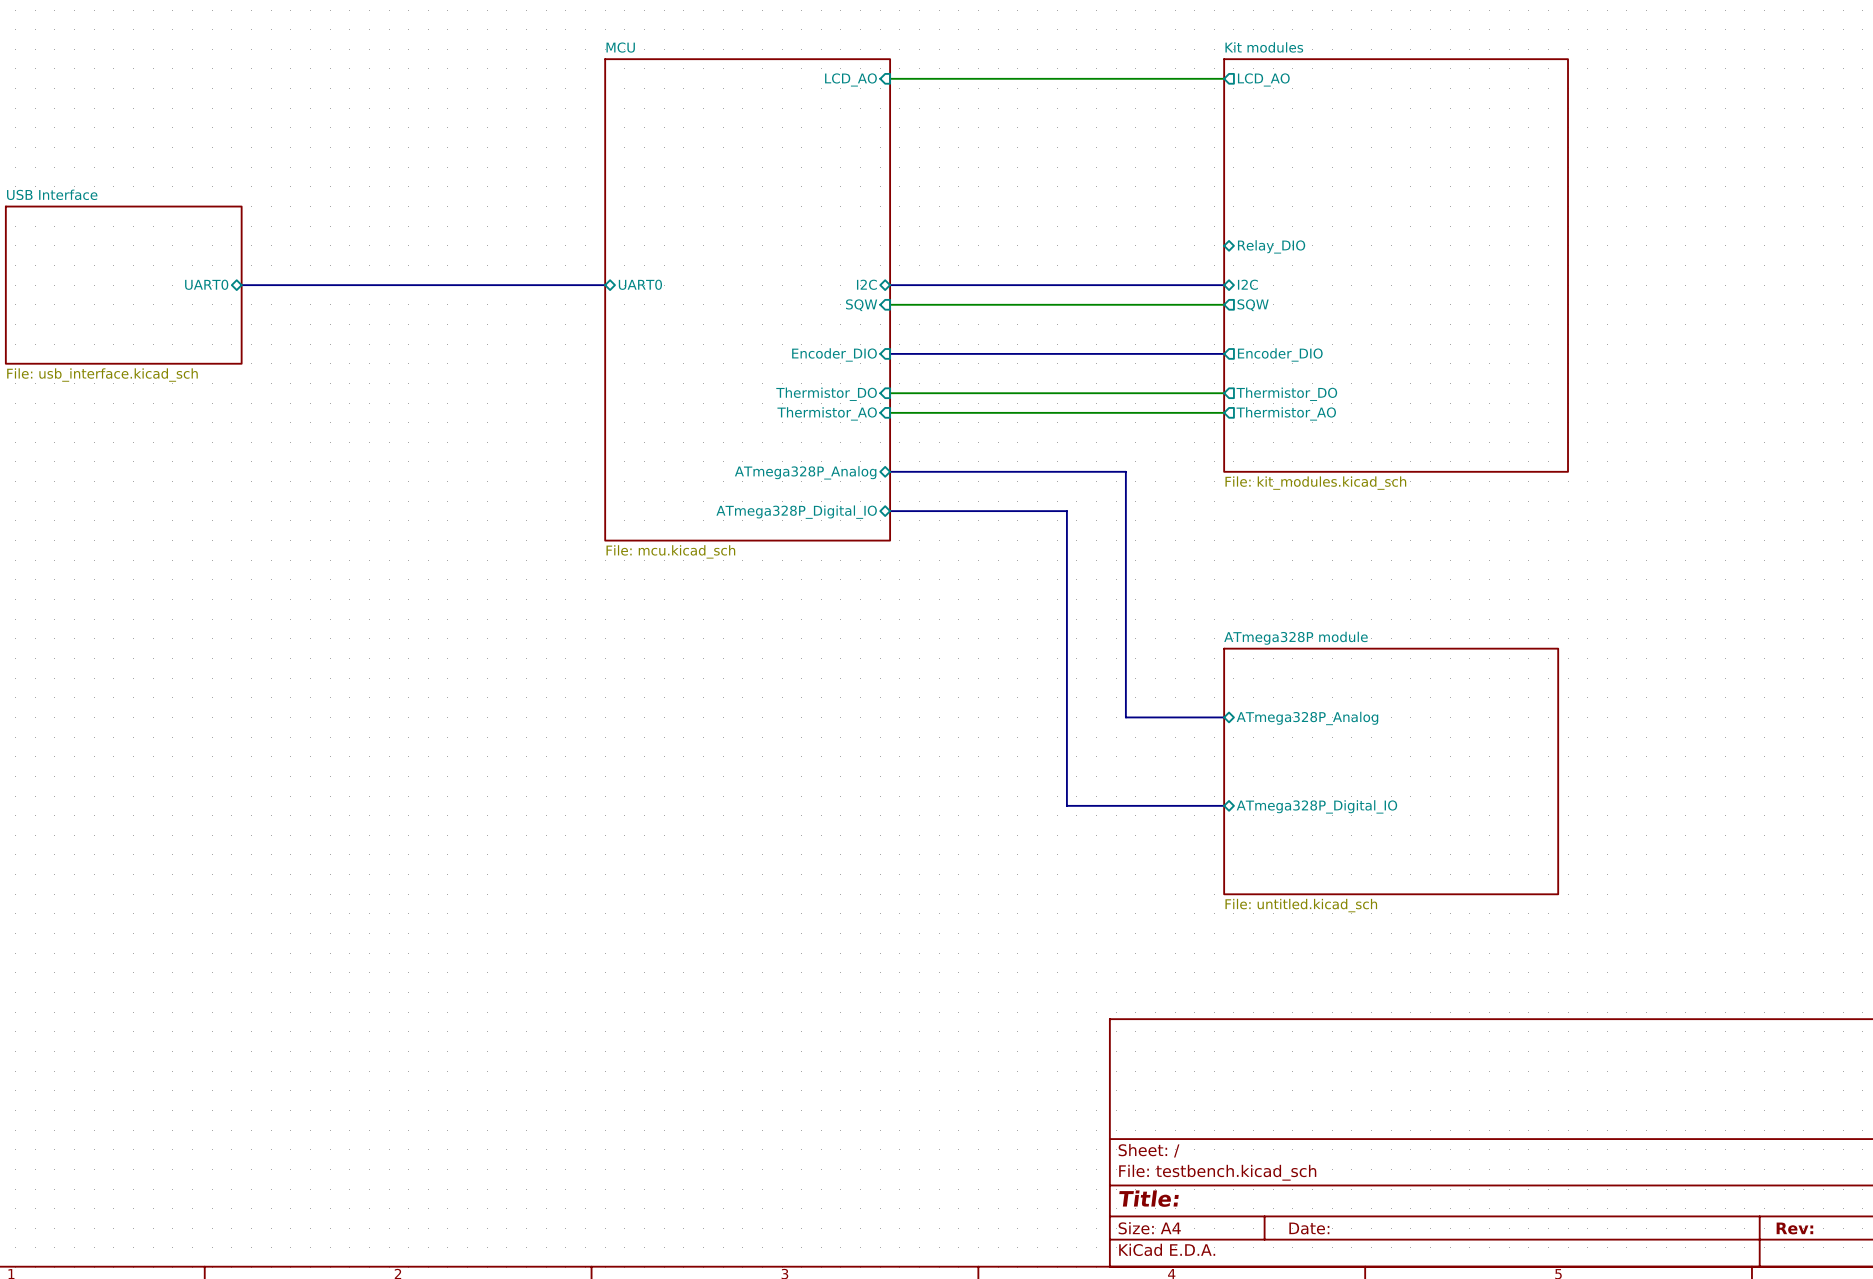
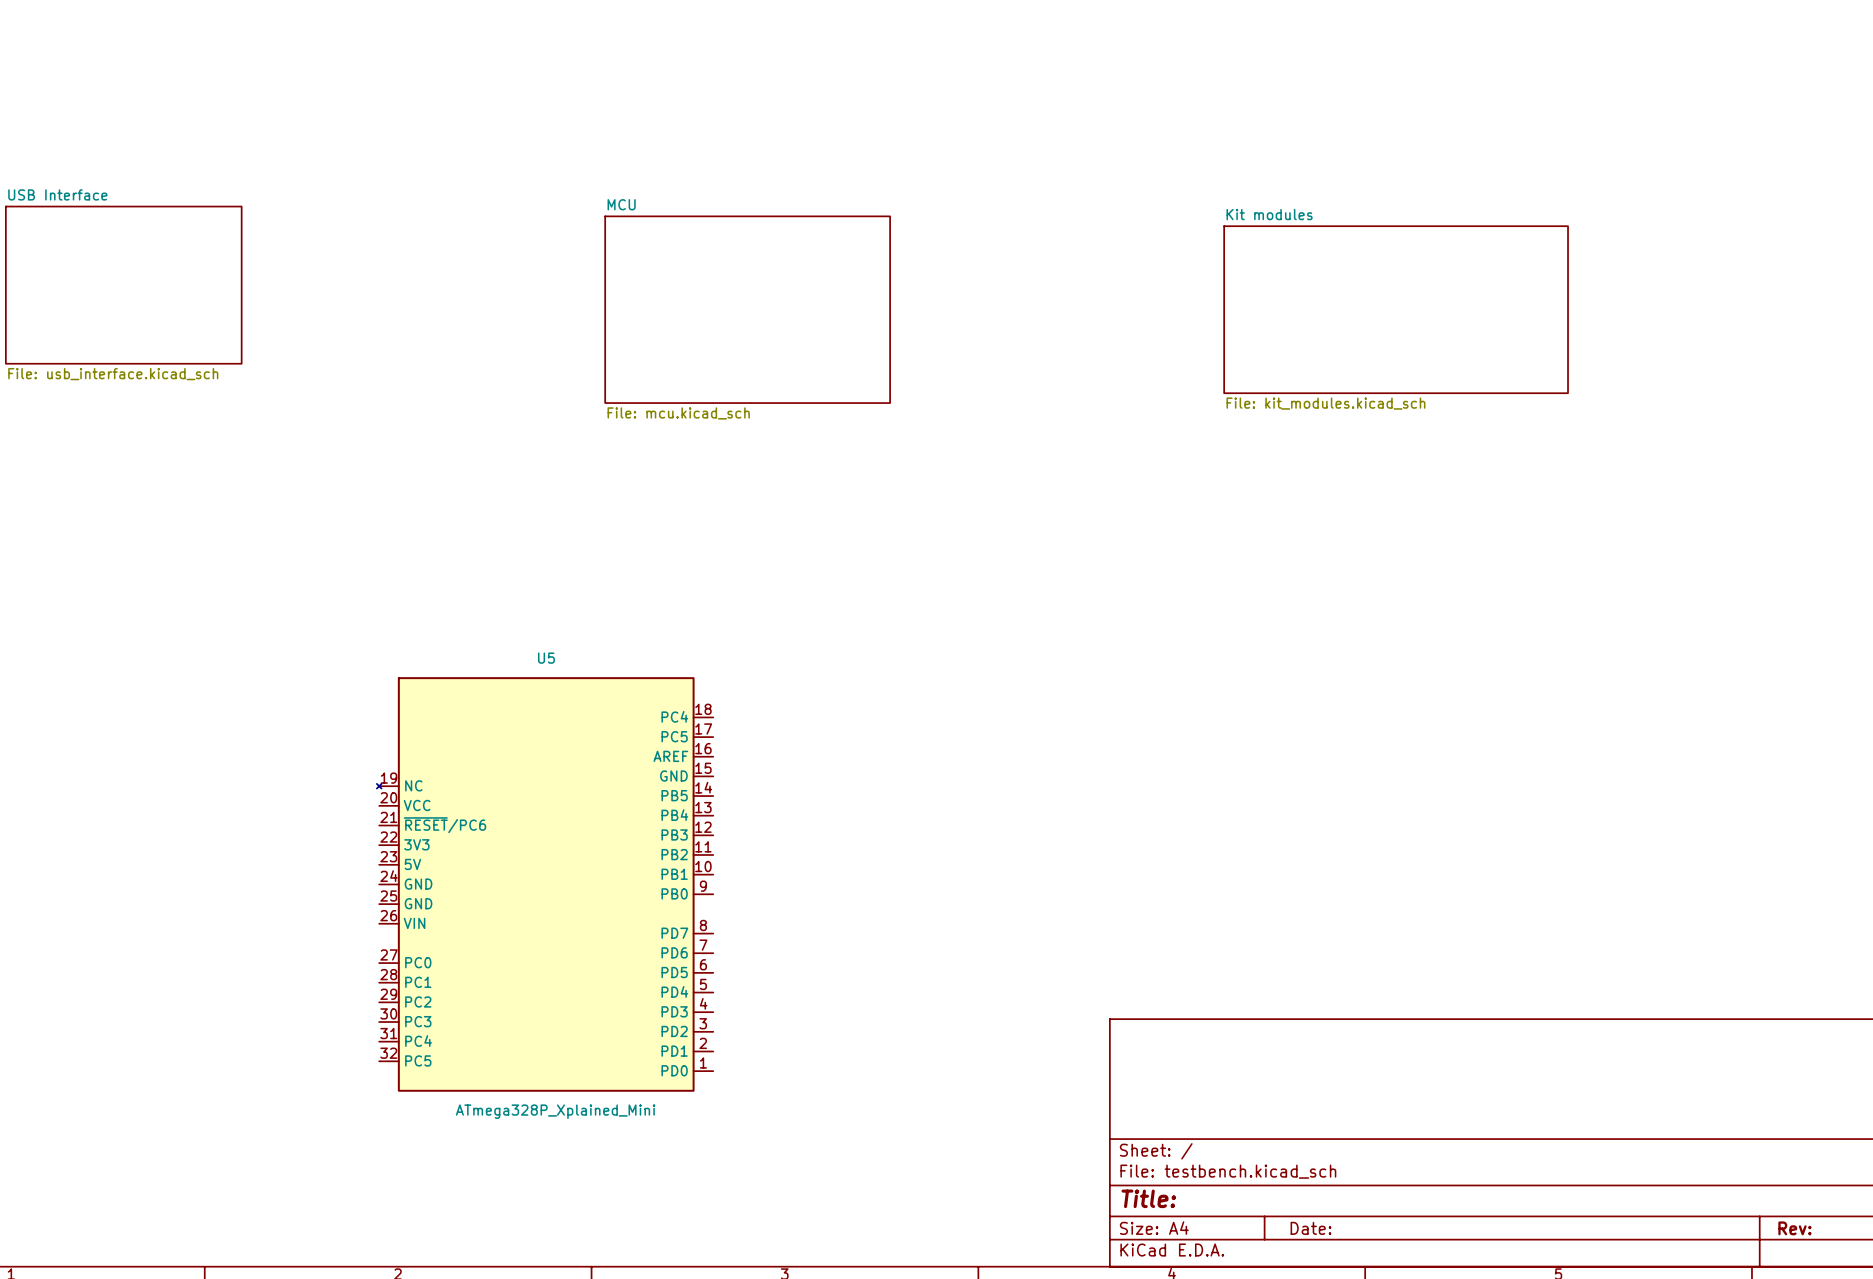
wire: (890, 78) (1224, 78) -> none
sheet pin: LCD_AO (850, 79) -> none
sheet pin: LCD_AO (1263, 79) -> none
sheet pin: Relay_DIO (1271, 246) -> none
sheet Kit modules: File: kit_modules.kicad_sch (1396, 265) -> none
sheet pin: UART0 (206, 284) -> none
sheet pin: UART0 (640, 284) -> none
sheet pin: I2C (866, 284) -> none
sheet pin: I2C (1247, 284) -> none
bus: (241, 285) (605, 285) -> none
bus: (890, 285) (1224, 285) -> none
sheet MCU: File: mcu.kicad_sch (747, 299) -> none
wire: (890, 304) (1224, 304) -> none
sheet pin: SQW (861, 305) -> none
sheet pin: SQW (1253, 305) -> none
sheet MCU: none -> File: mcu.kicad_sch (747, 309)
sheet Kit modules: none -> File: kit_modules.kicad_sch (1396, 309)
bus: (890, 353) (1224, 353) -> none
sheet pin: Encoder_DIO (834, 354) -> none
sheet pin: Encoder_DIO (1280, 354) -> none
wire: (890, 393) (1224, 393) -> none
sheet pin: Thermistor_DO (826, 394) -> none
sheet pin: Thermistor_DO (1286, 394) -> none
wire: (890, 412) (1224, 412) -> none
sheet pin: Thermistor_AO (827, 413) -> none
sheet pin: Thermistor_AO (1286, 413) -> none
bus: (890, 471) (1125, 471) (1125, 717) (1224, 717) -> none
sheet pin: ATmega328P_Analog (805, 472) -> none
bus: (890, 511) (1066, 511) (1066, 805) (1224, 805) -> none
sheet pin: ATmega328P_Digital_IO (796, 512) -> none
sheet pin: ATmega328P_Analog (1307, 718) -> none
sheet ATmega328P module: File: untitled.kicad_sch (1391, 771) -> none
sheet pin: ATmega328P_Digital_IO (1316, 806) -> none
U5: none -> ATmega328P_Xplained_Mini (545, 884)

